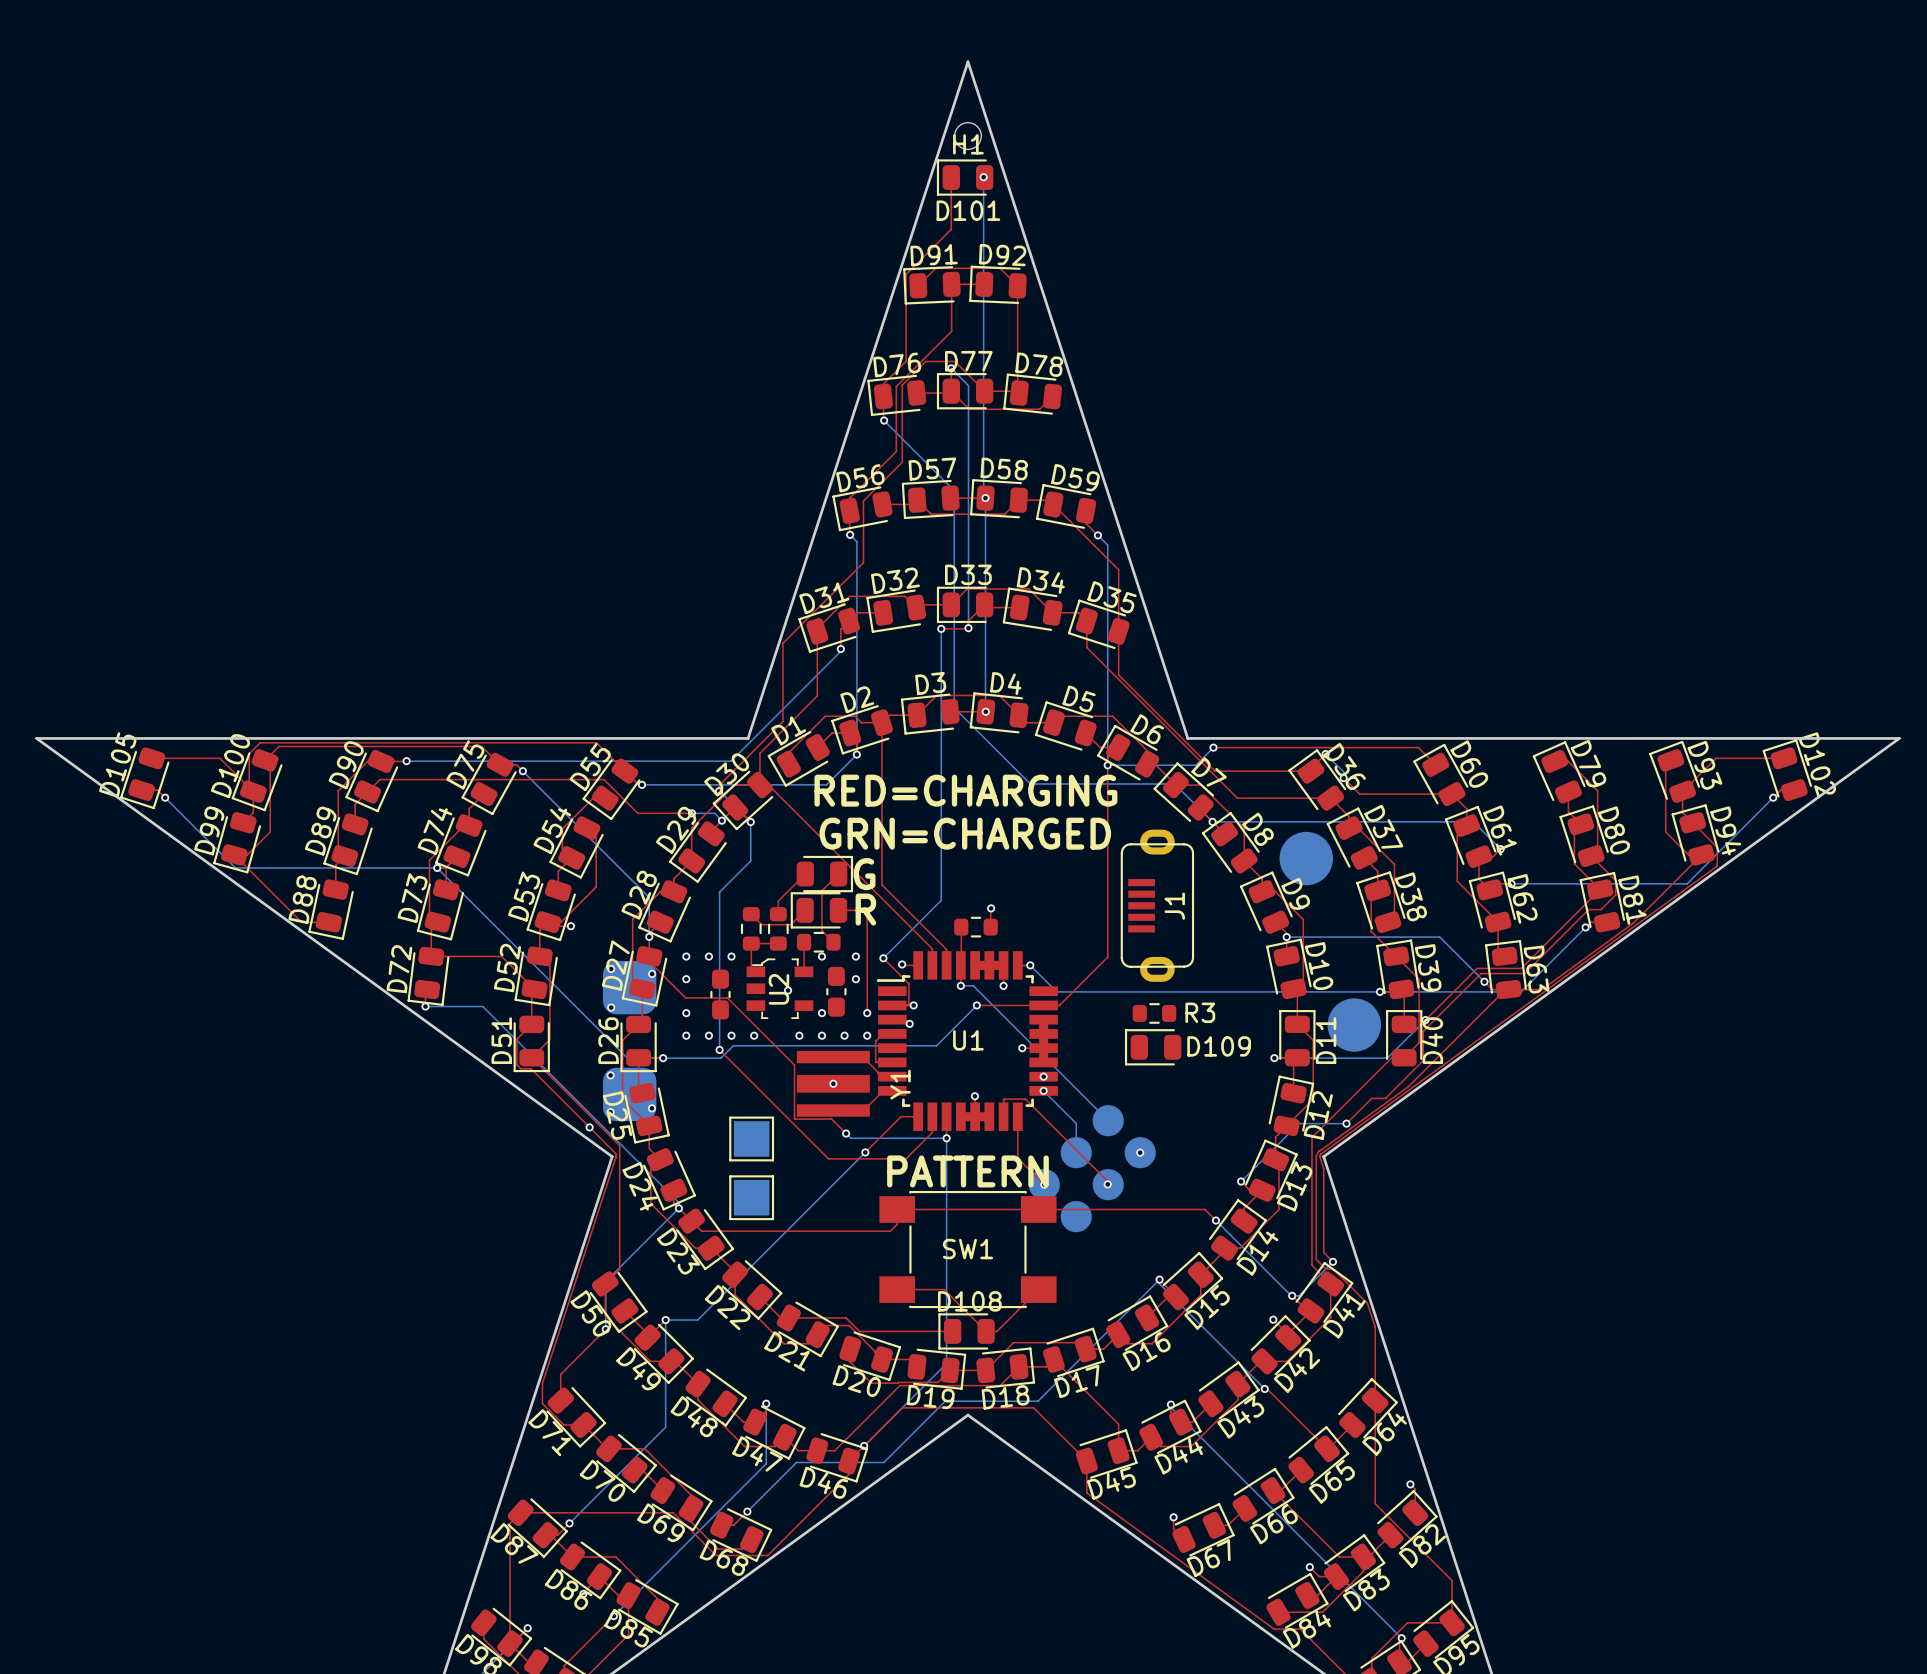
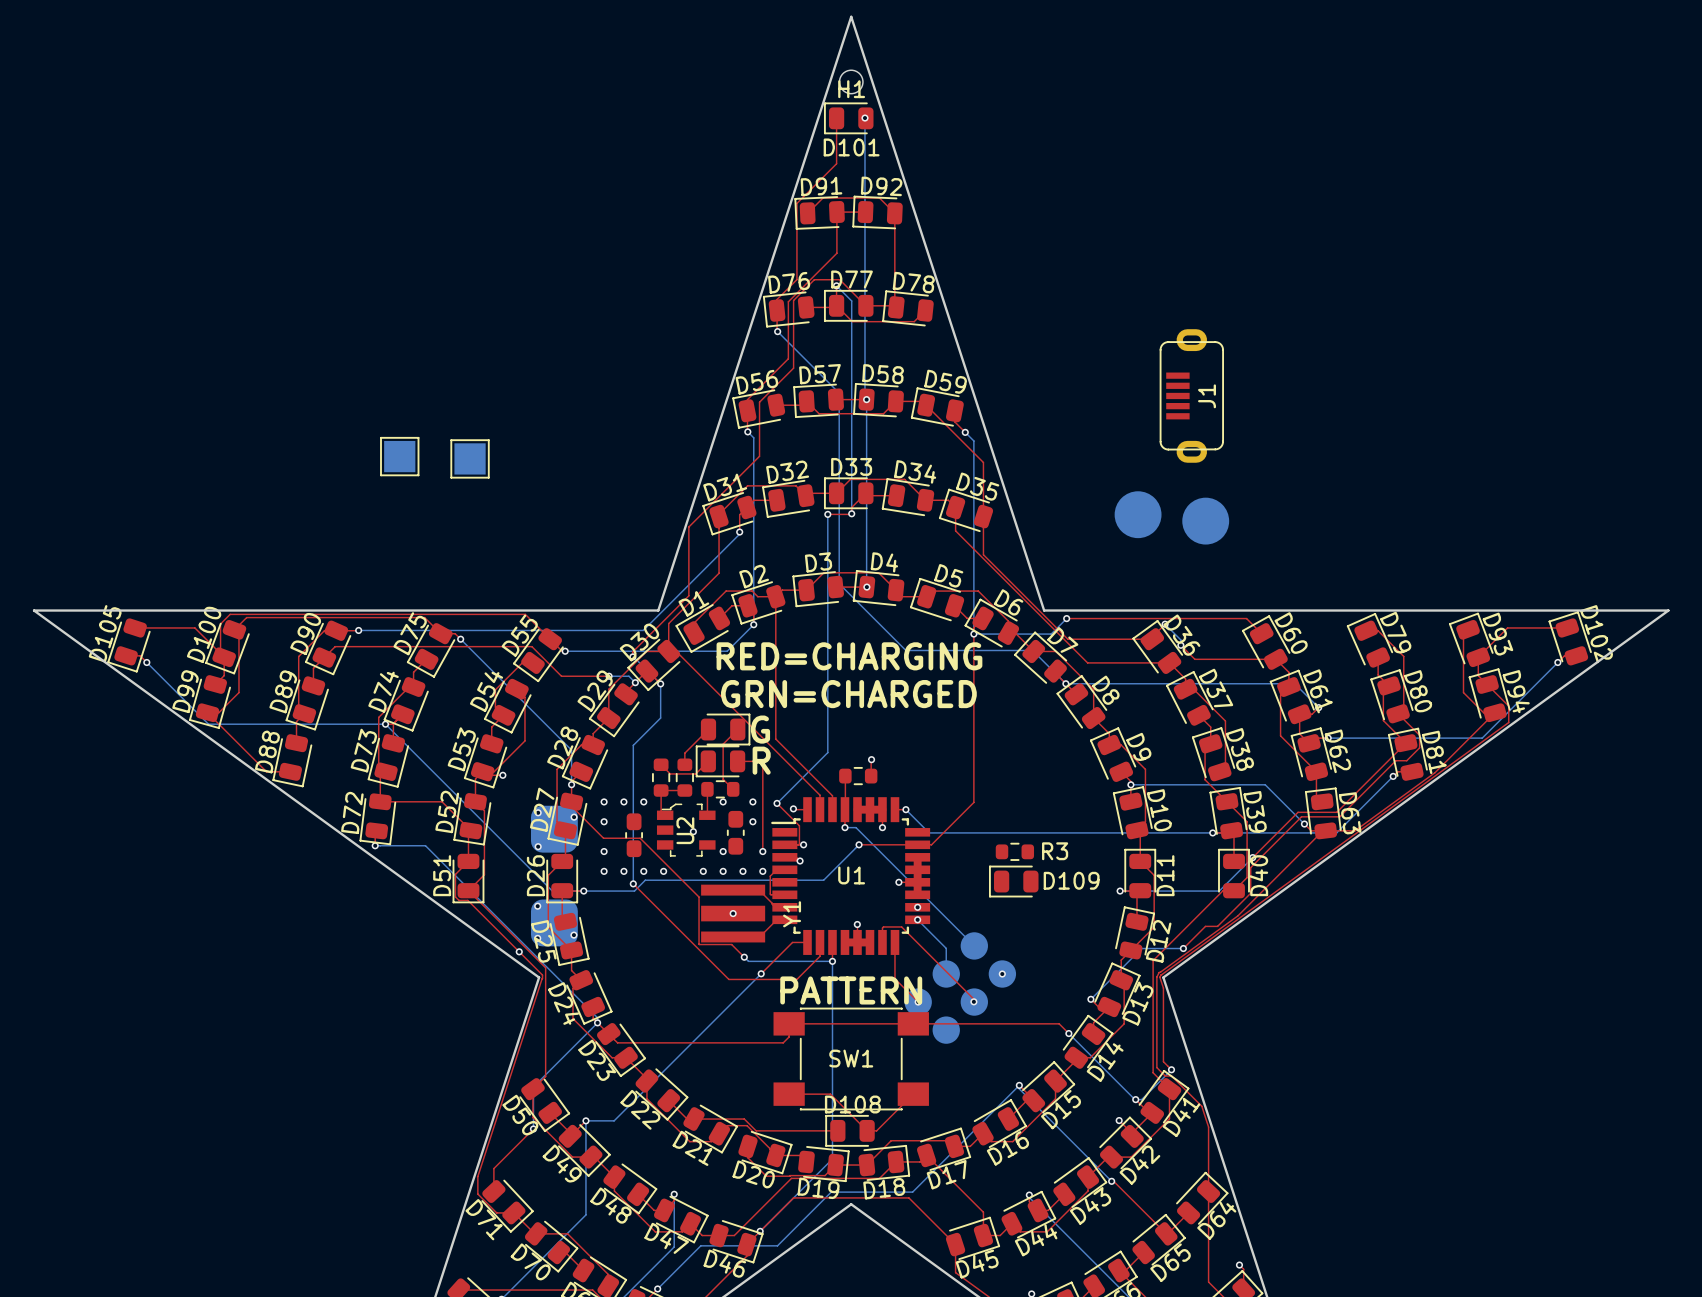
part: none -> (399, 456)
part: none -> (470, 458)
part: none -> (1138, 514)
part: none -> (1205, 521)
part: (1306, 858) -> none
J1 position: (1157, 905) -> (1191, 395)
part: (1354, 1025) -> none
part: (751, 1138) -> none
part: (751, 1197) -> none

